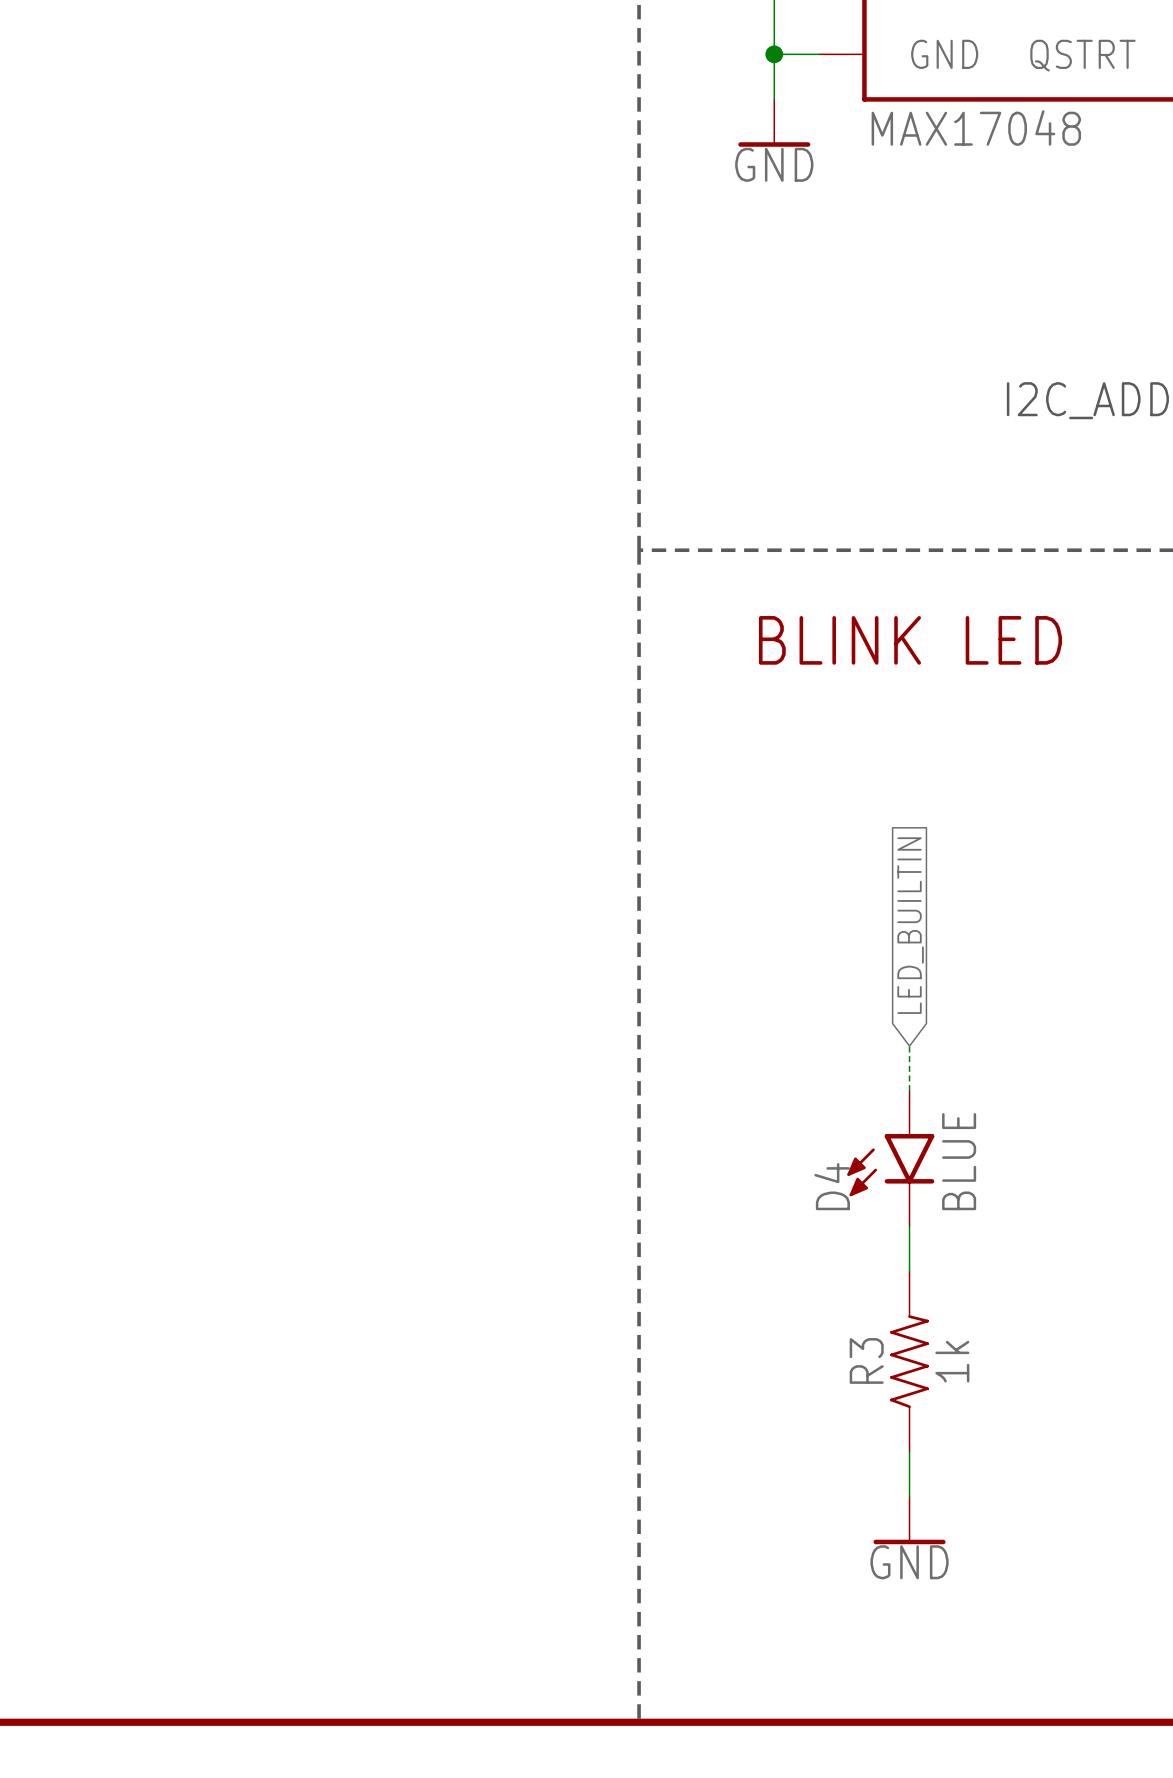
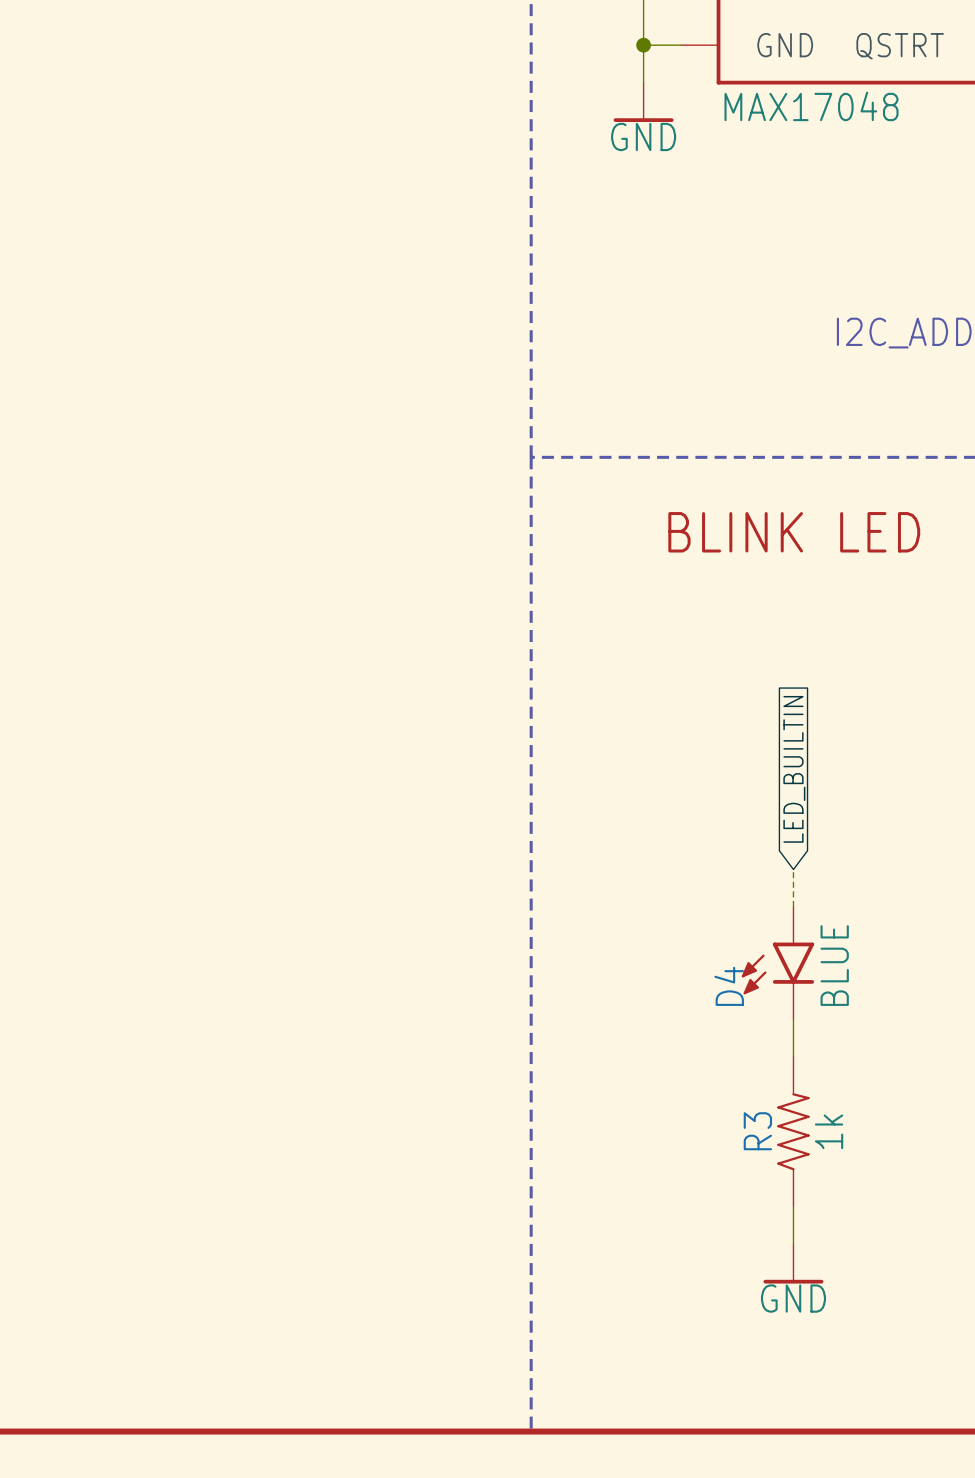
text position: BLINK LED (910, 640) -> BLINK LED (794, 532)
global label position: LED_BUILTIN (910, 925) -> LED_BUILTIN (794, 769)
wire: (909, 1046) (909, 1091) -> (793, 869) (793, 906)
D4 position: (890, 1158) -> (777, 963)
wire: (909, 1226) (909, 1271) -> (793, 1019) (793, 1056)
R3 position: (909, 1361) -> (793, 1131)
wire: (909, 1451) (909, 1496) -> (793, 1206) (793, 1244)
power symbol position: GND (909, 1520) -> GND (793, 1263)

